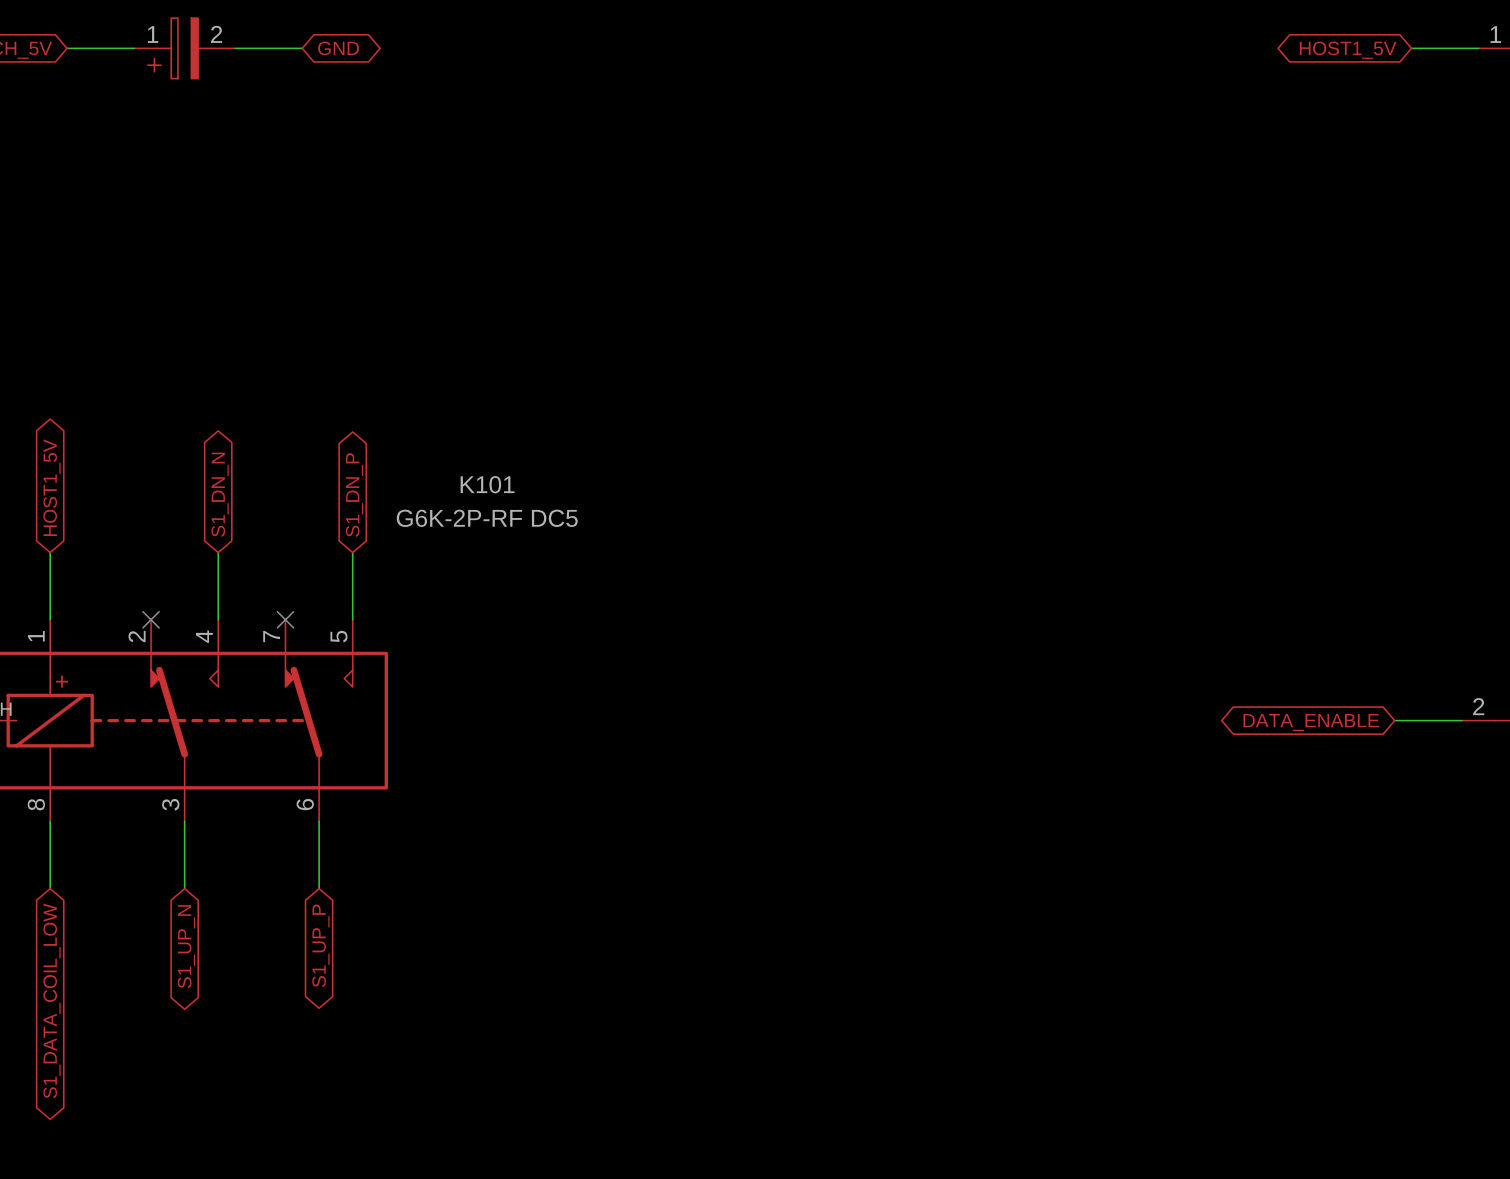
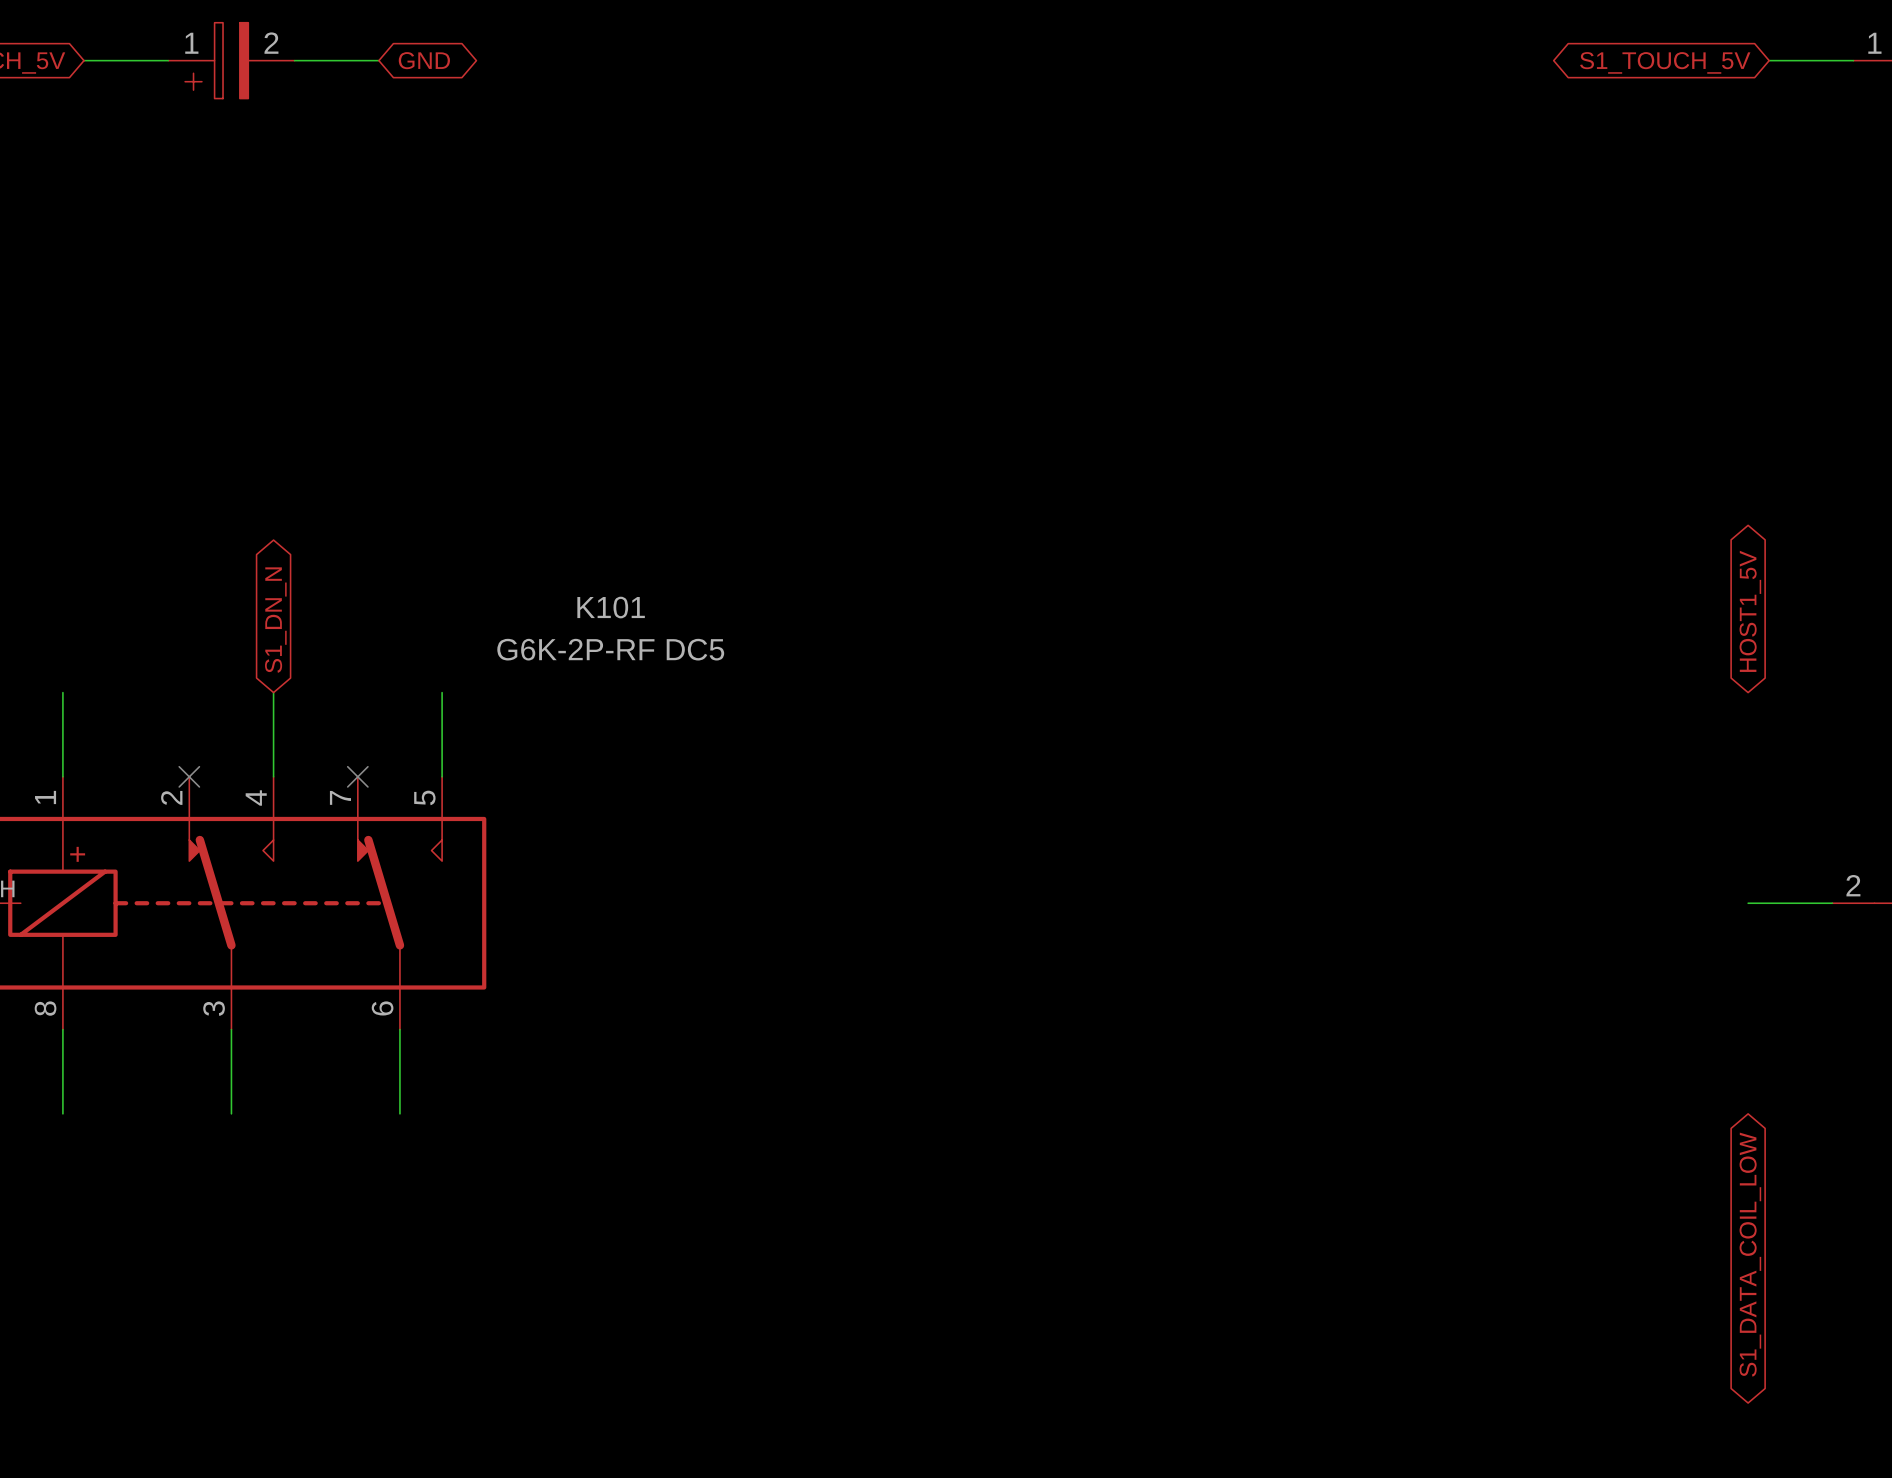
global label: HOST1_5V (1348, 50) -> S1_TOUCH_5V (1665, 62)
global label: HOST1_5V (52, 487) -> none
global label: none -> HOST1_5V (1750, 611)
global label: S1_DN_P (354, 494) -> none
global label: DATA_ENABLE (1311, 722) -> none
global label: S1_UP_P (320, 945) -> none
global label: S1_UP_N (186, 946) -> none
global label: S1_DATA_COIL_LOW (52, 1000) -> none
global label: none -> S1_DATA_COIL_LOW (1750, 1254)

